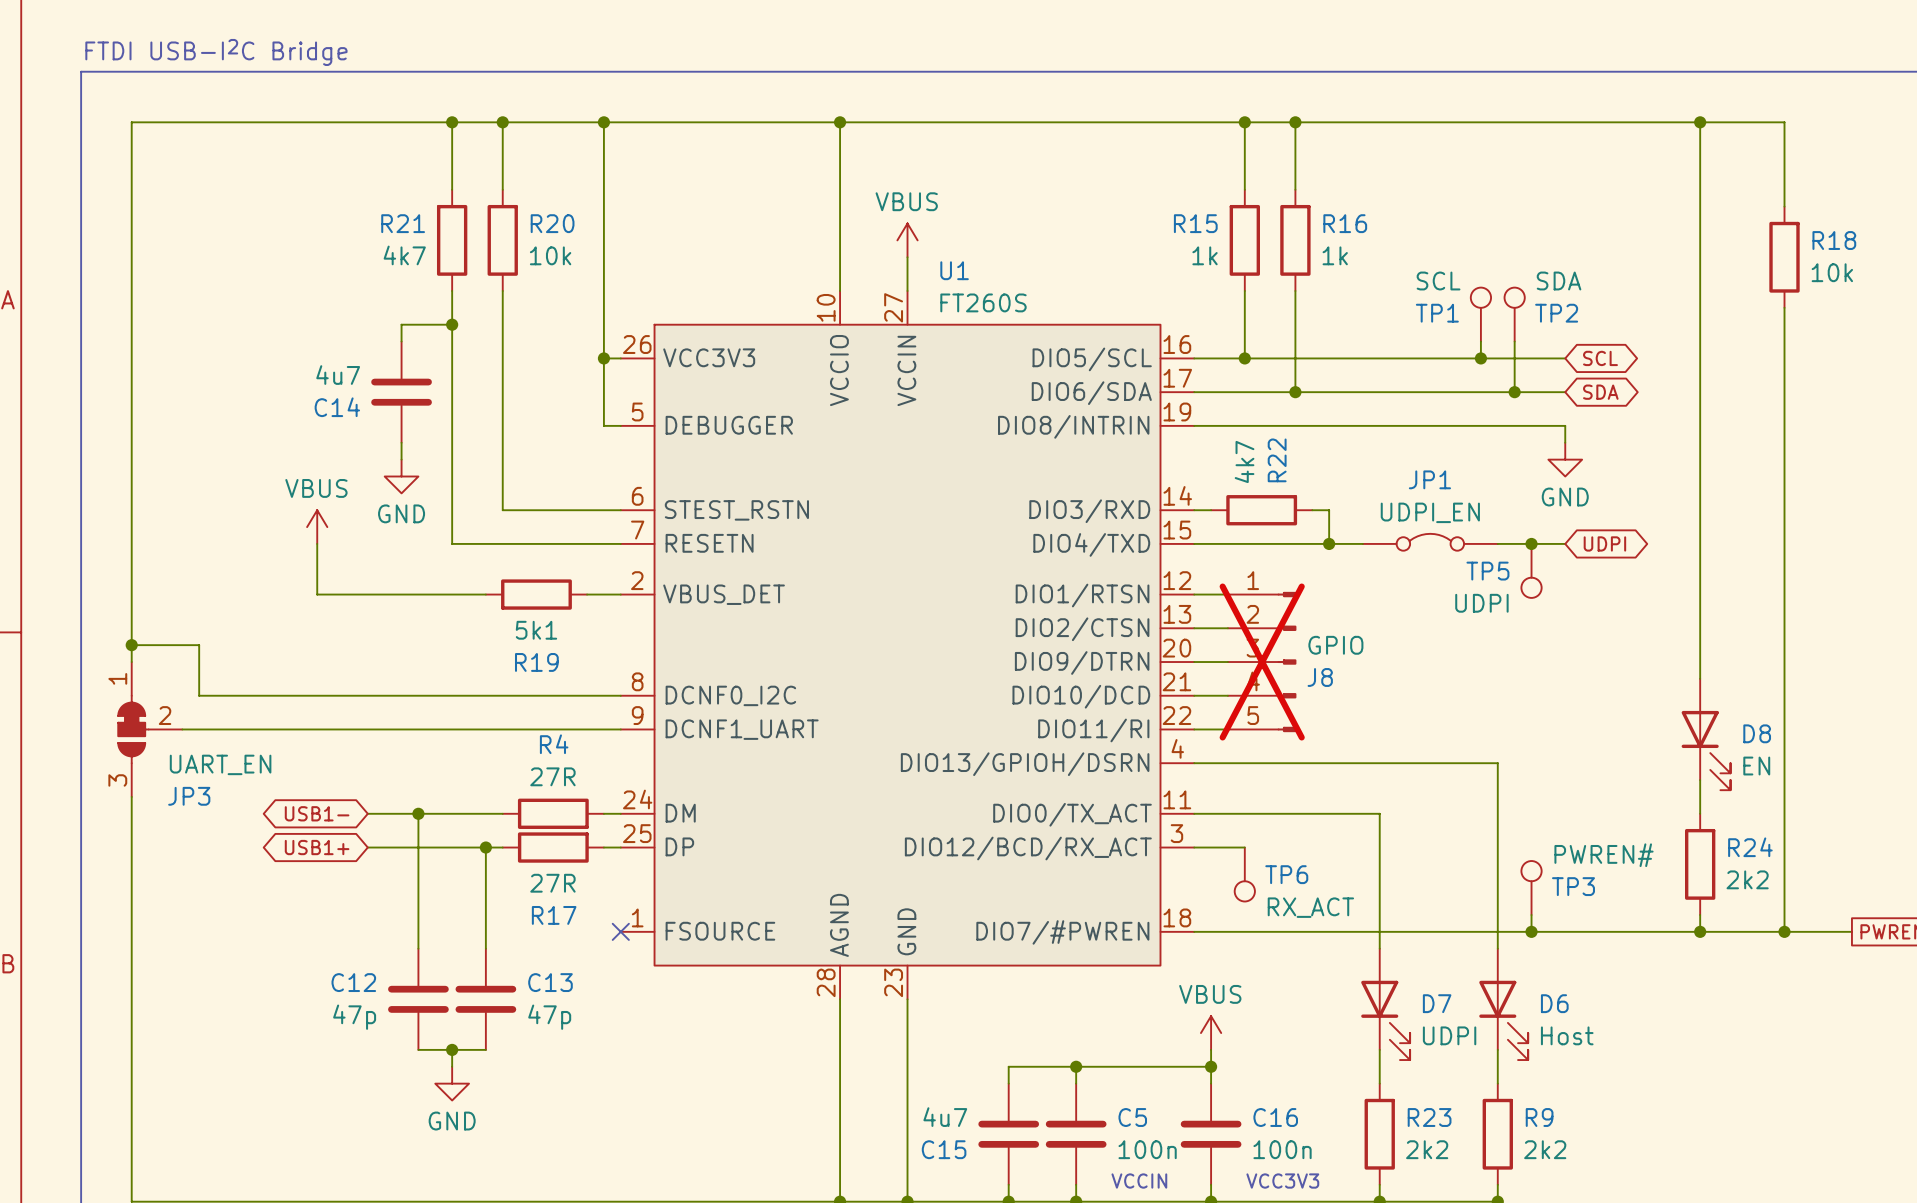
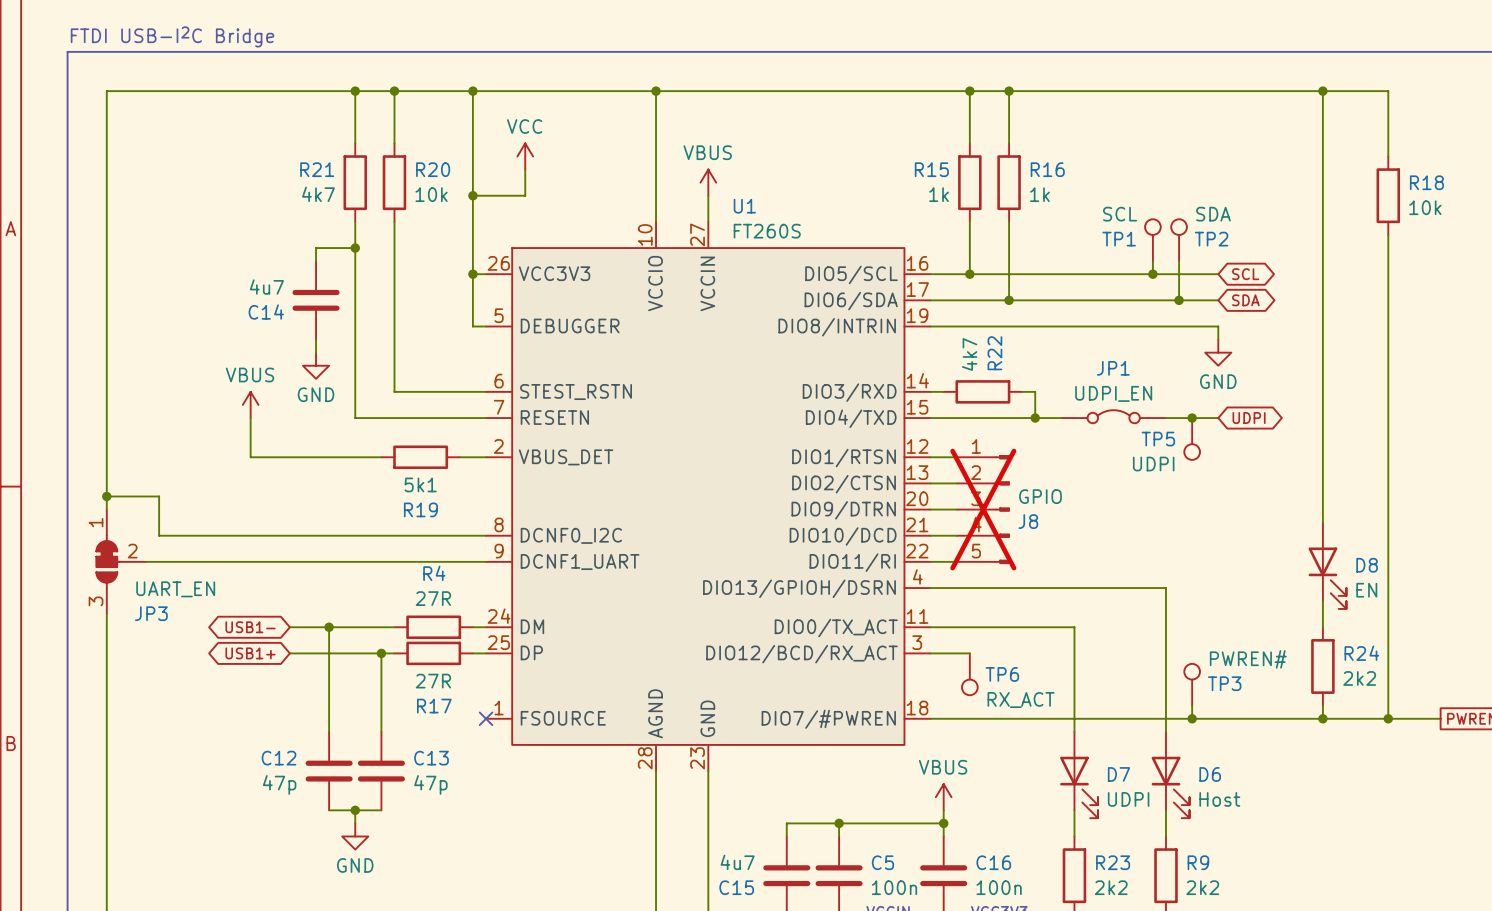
power symbol: none -> VCC (525, 156)
wire: none -> (525, 169) (525, 195) (472, 195)
junction: none -> (472, 195)

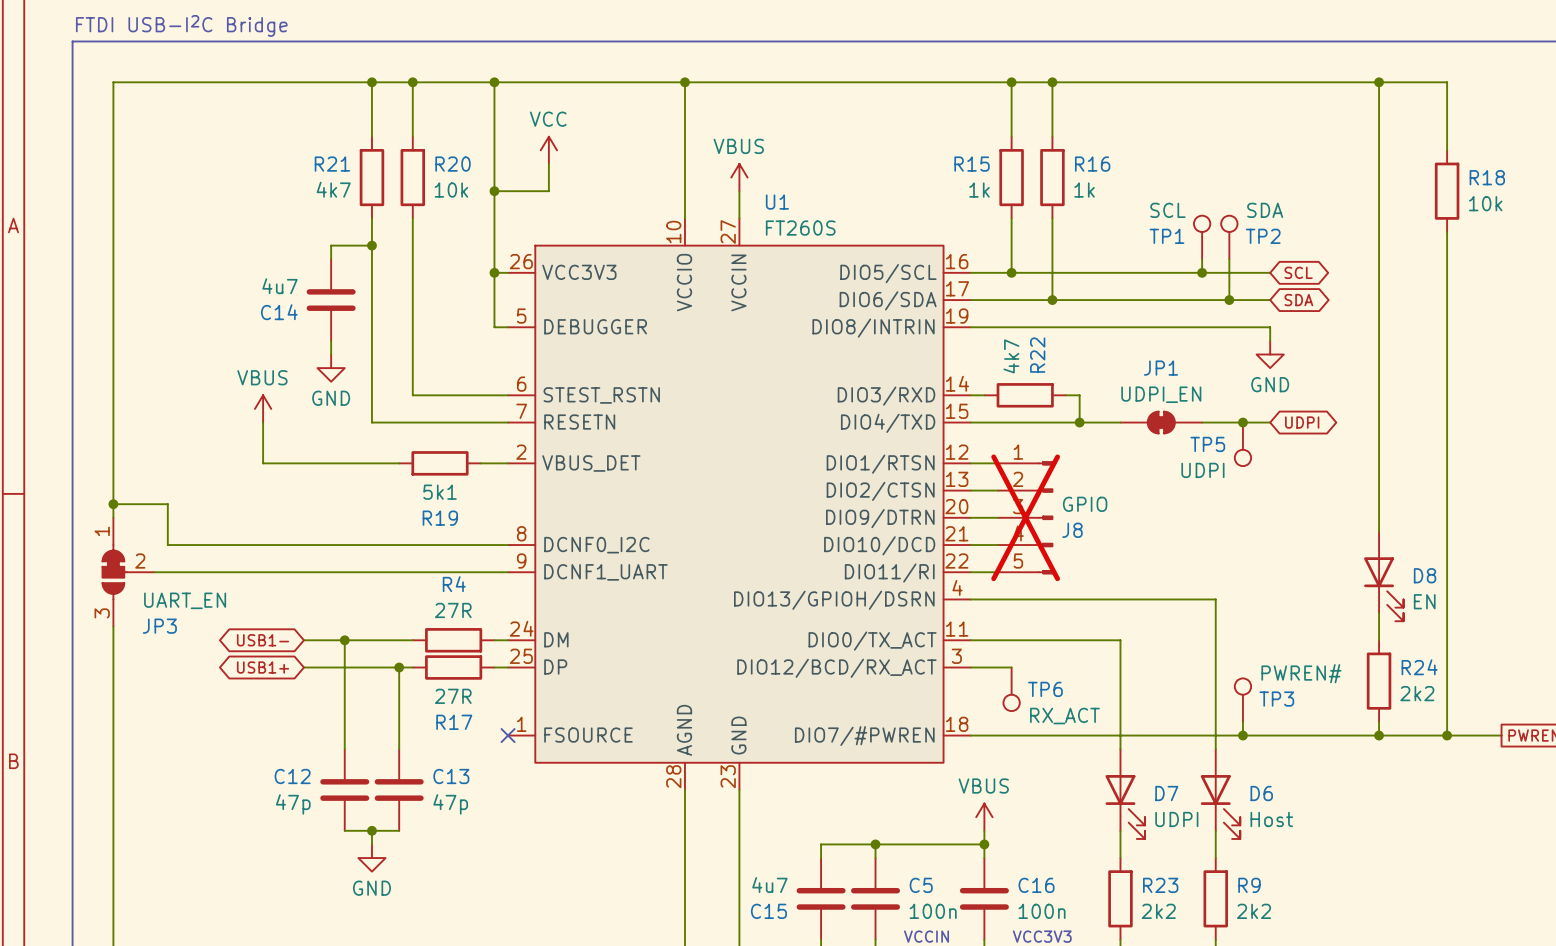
JP1 symbol: [1061, 410, 1166, 424] -> [1120, 411, 1203, 434]

